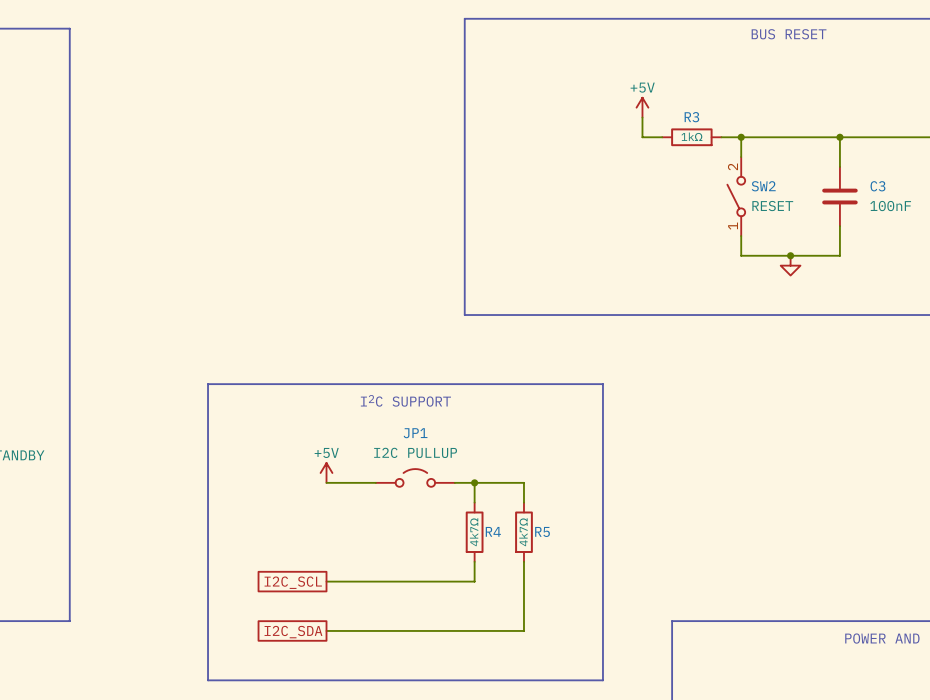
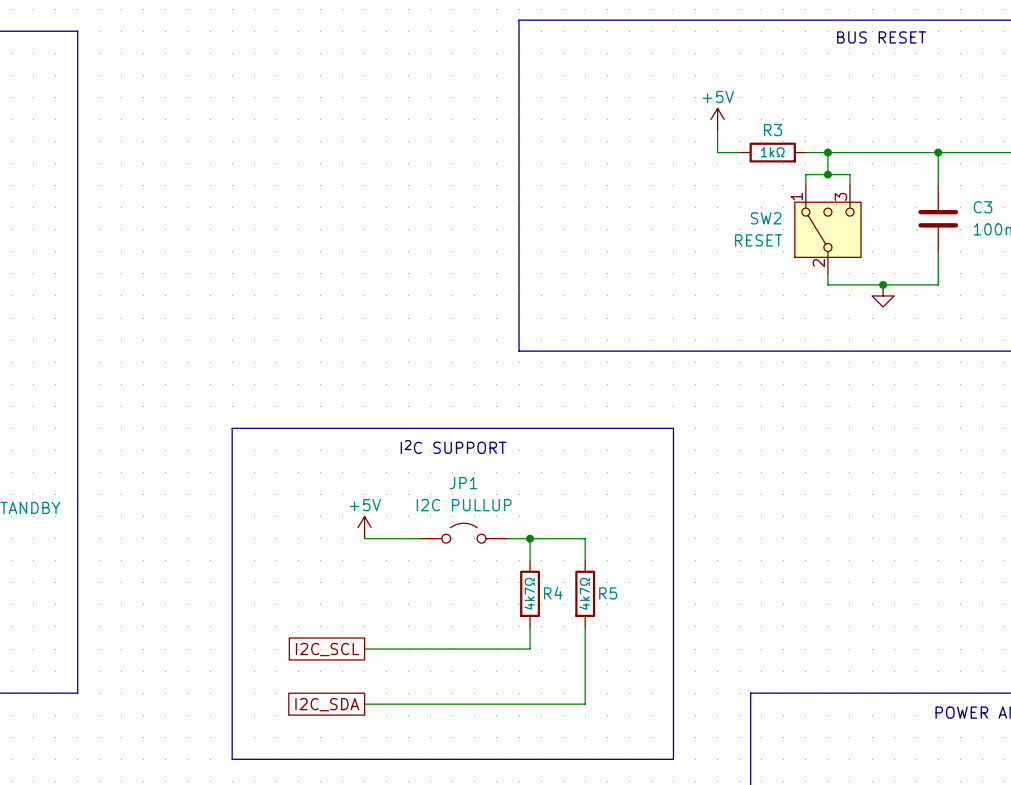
SW2 symbol: [727, 157, 746, 237] -> [794, 185, 862, 274]
junction: none -> (827, 174)
wire: none -> (805, 185) (805, 174) (849, 174) (849, 185)
SW2 name position: SW2 (763, 186) -> SW2 (766, 218)
SW2 value position: RESET (772, 206) -> RESET (758, 240)

